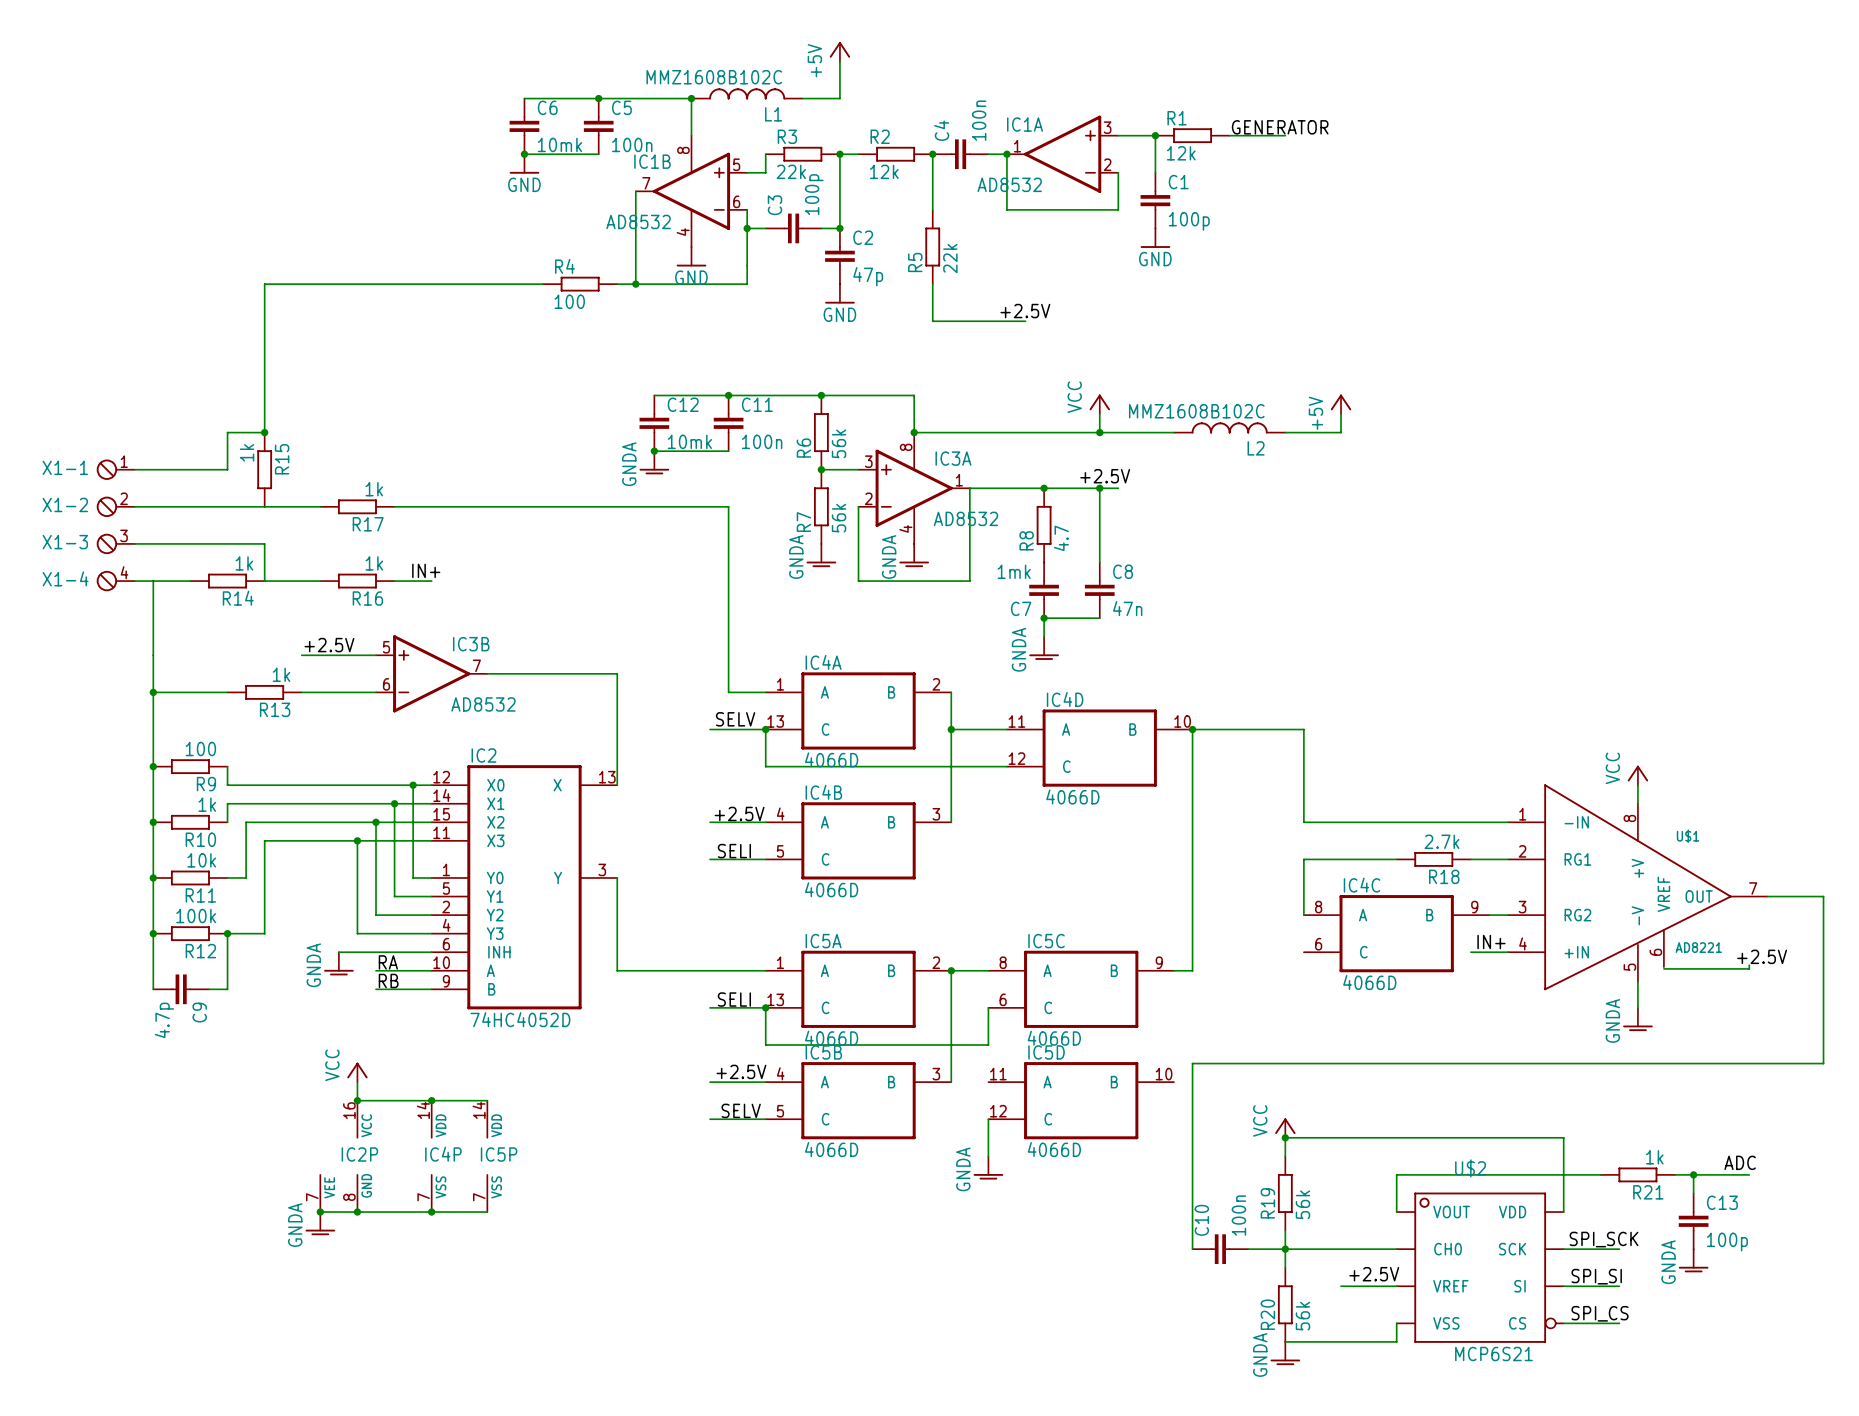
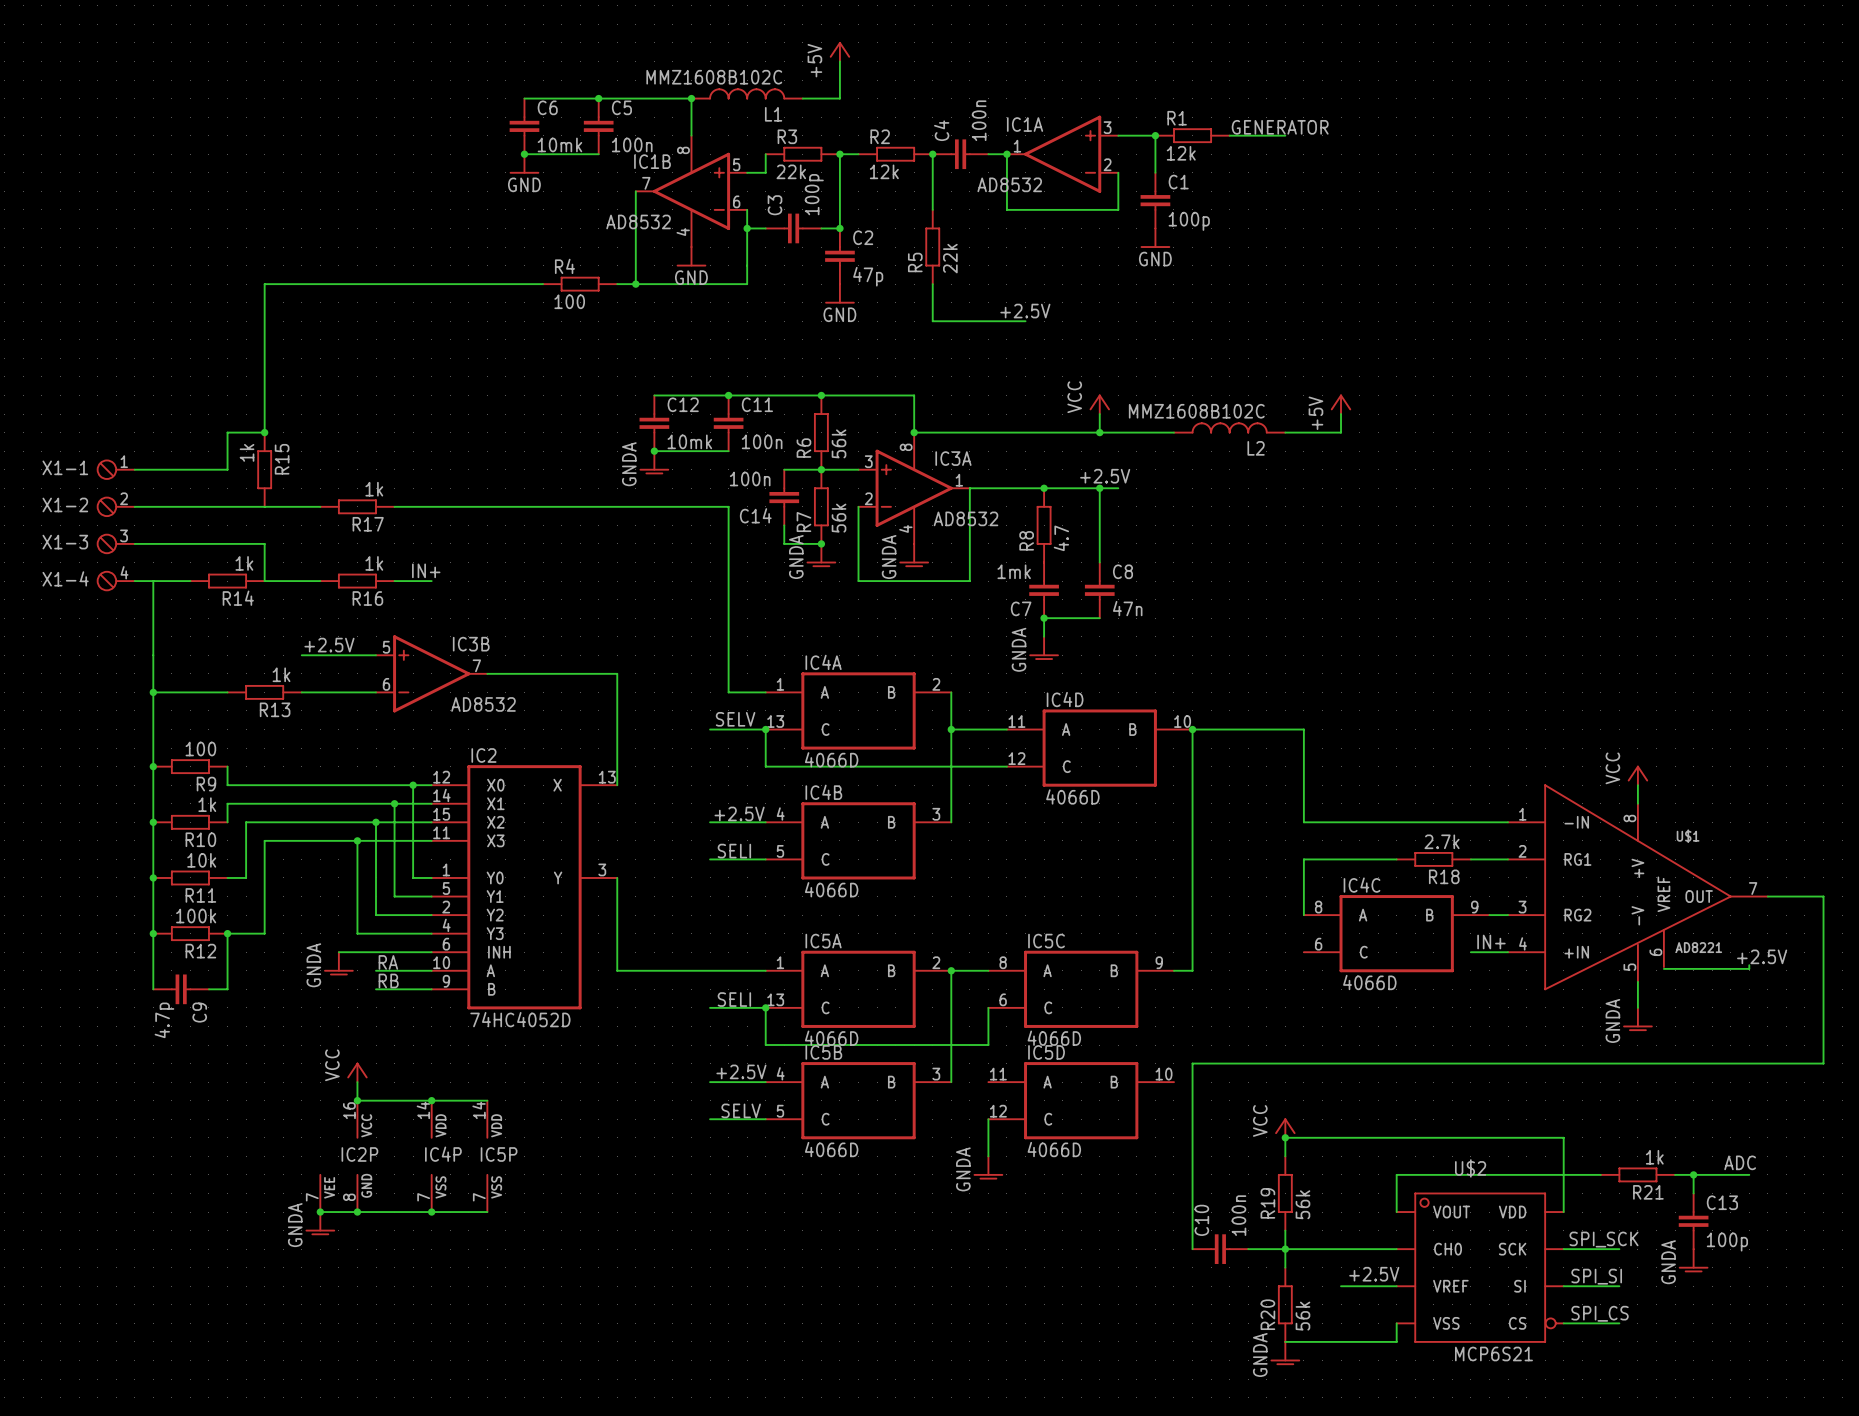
wire: none -> (784, 469) (821, 469)
C14: none -> 100n (784, 497)
wire: none -> (784, 525) (784, 543) (821, 543)
junction: none -> (821, 543)

